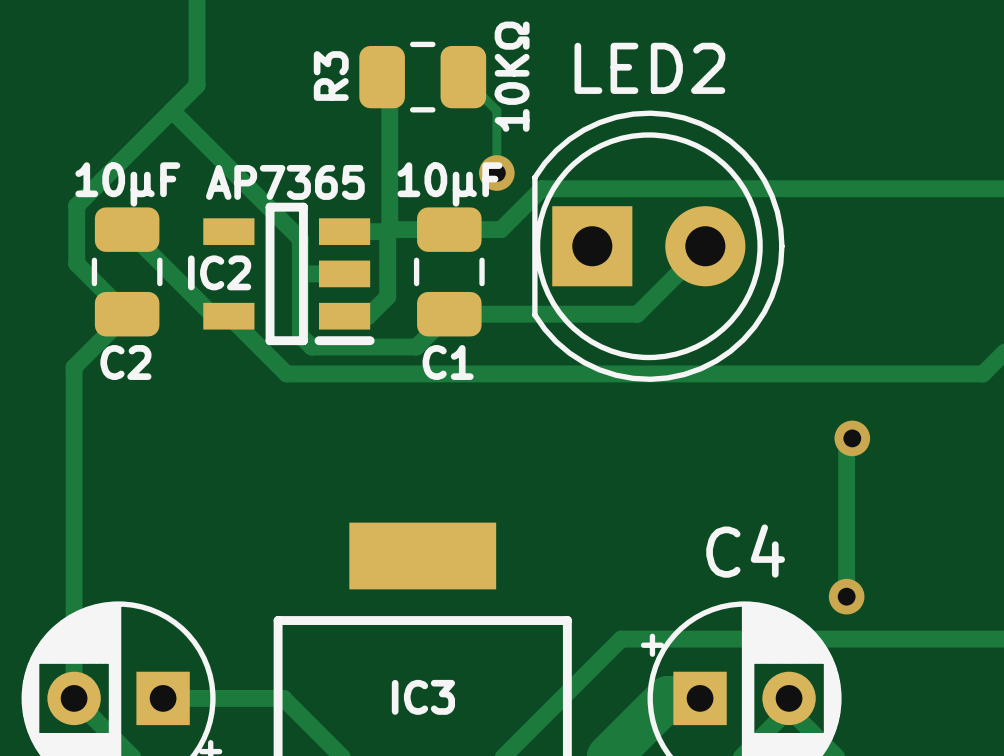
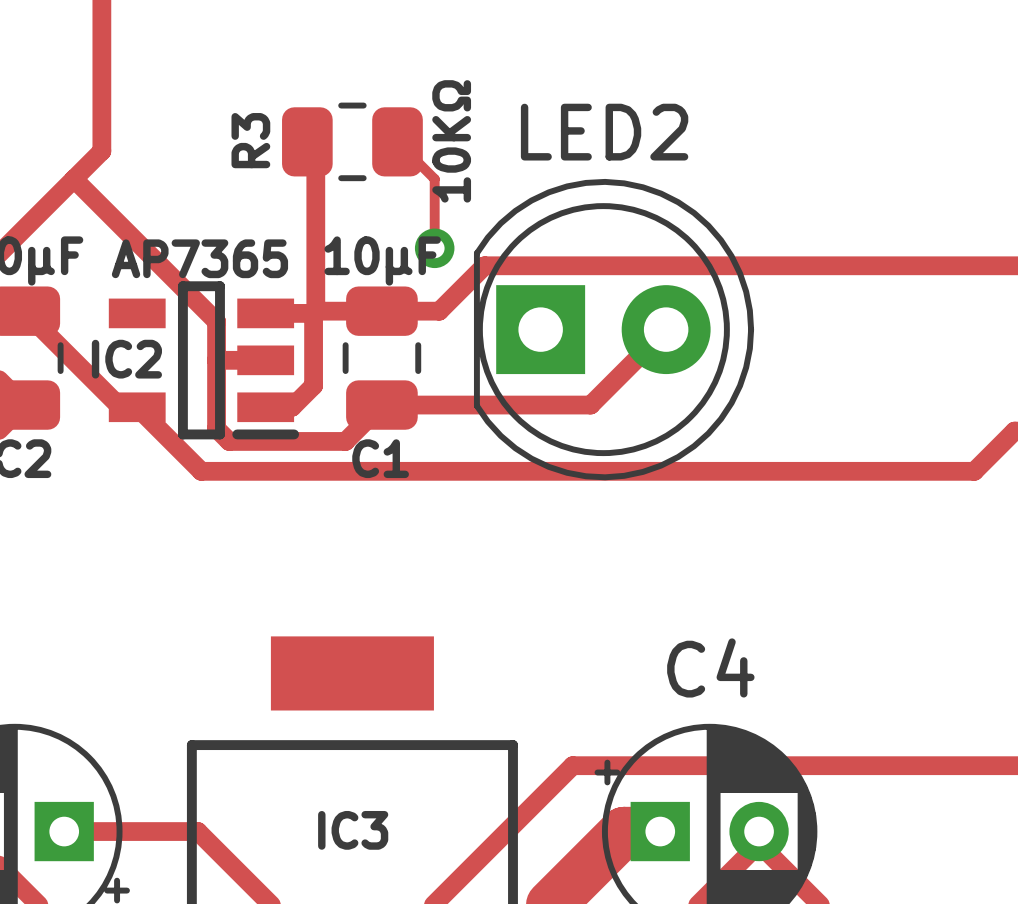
track: (852, 438) (846, 444) (846, 596) -> none
via: (852, 438) -> none
via: (846, 596) -> none

